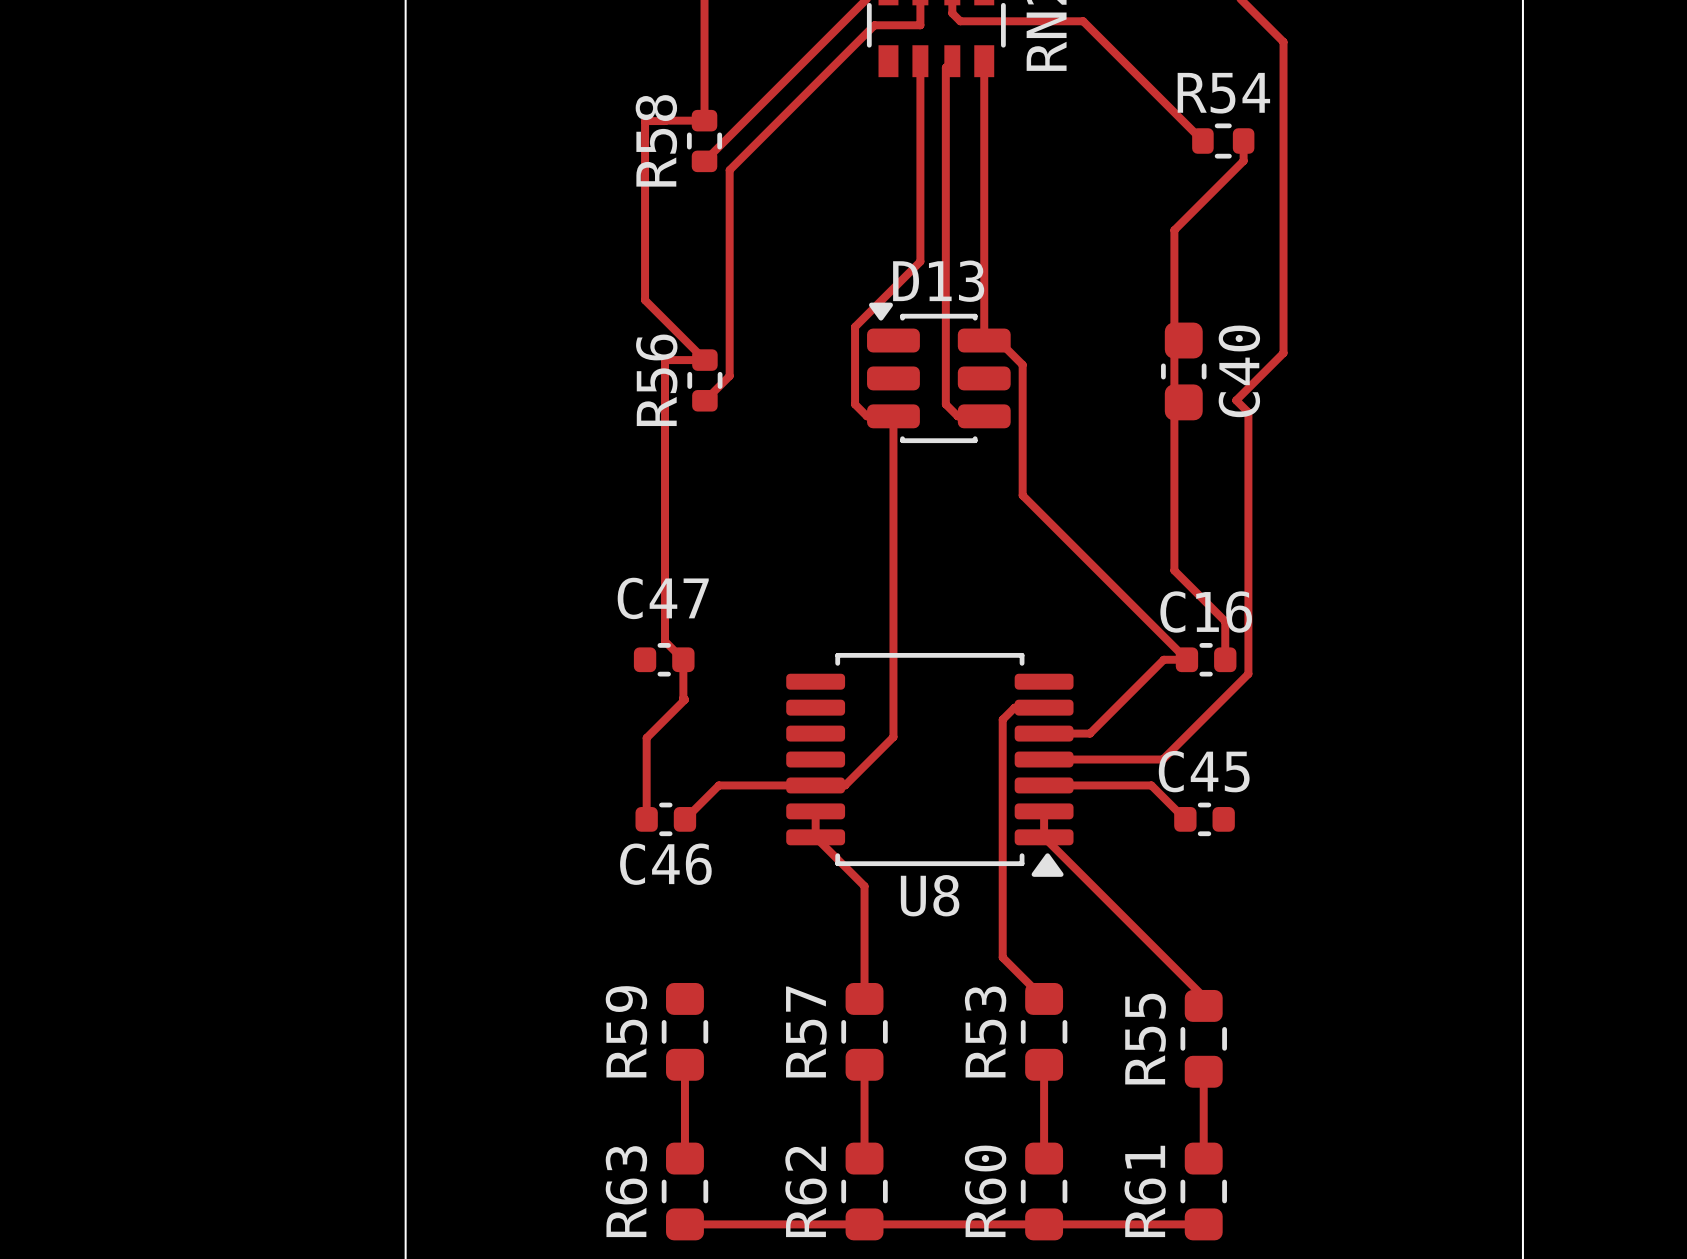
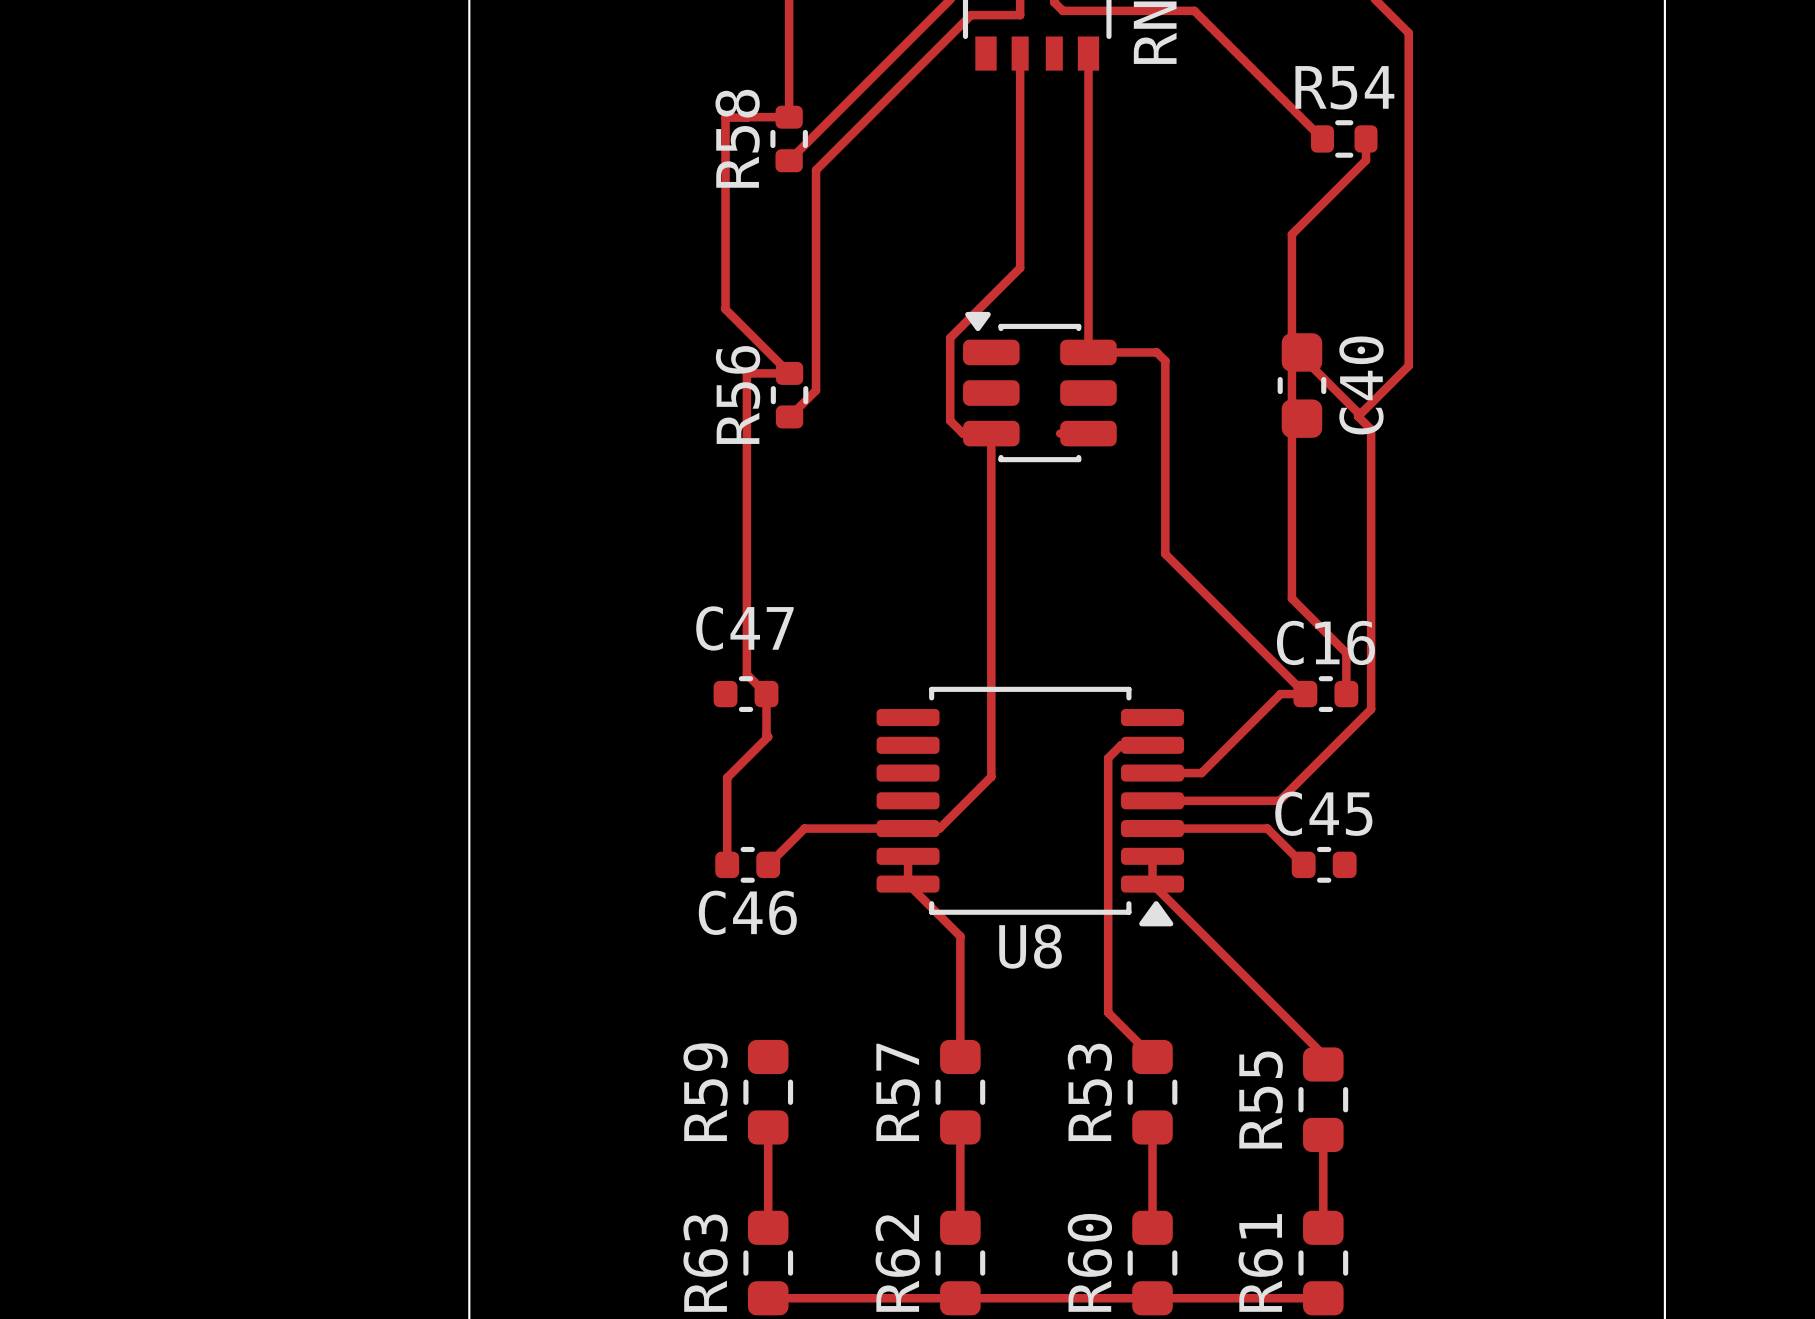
track: (952, 61) (945, 67) (945, 404) (957, 416) -> none
D13 name: D13 (938, 281) -> none
track: (998, 340) (1022, 364) (1022, 495) (1056, 528) -> (1103, 352) (1156, 352) (1165, 361) (1165, 554)
track: none -> (1309, 352) (1309, 363) (1358, 412) (1358, 416)

